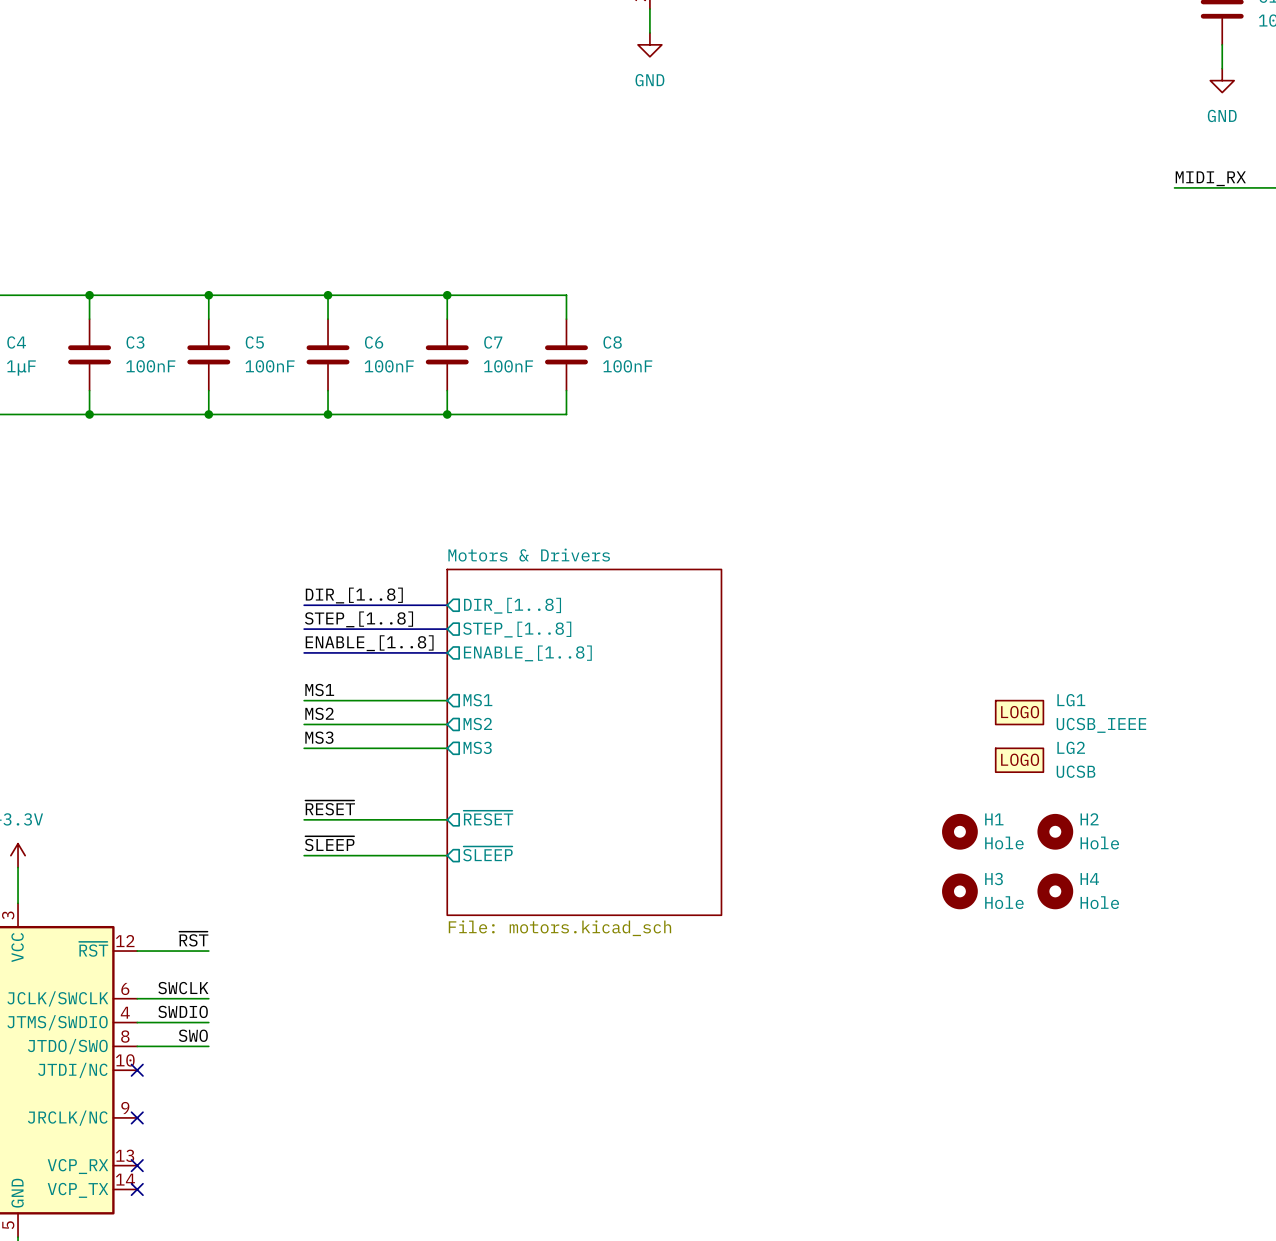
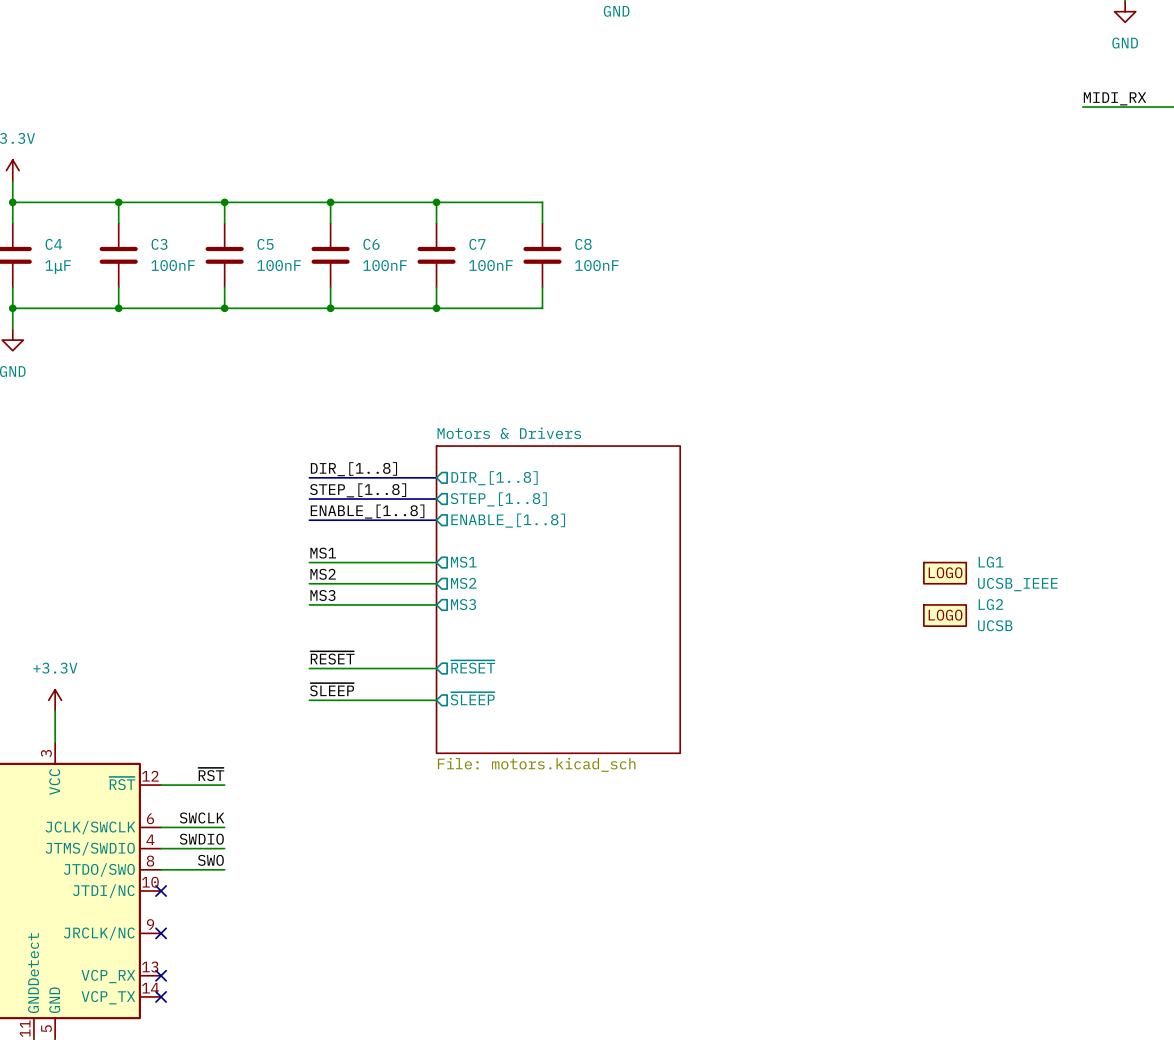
H1: Hole (959, 831) -> none
H2: Hole (1055, 831) -> none
H3: Hole (959, 891) -> none
H4: Hole (1055, 891) -> none

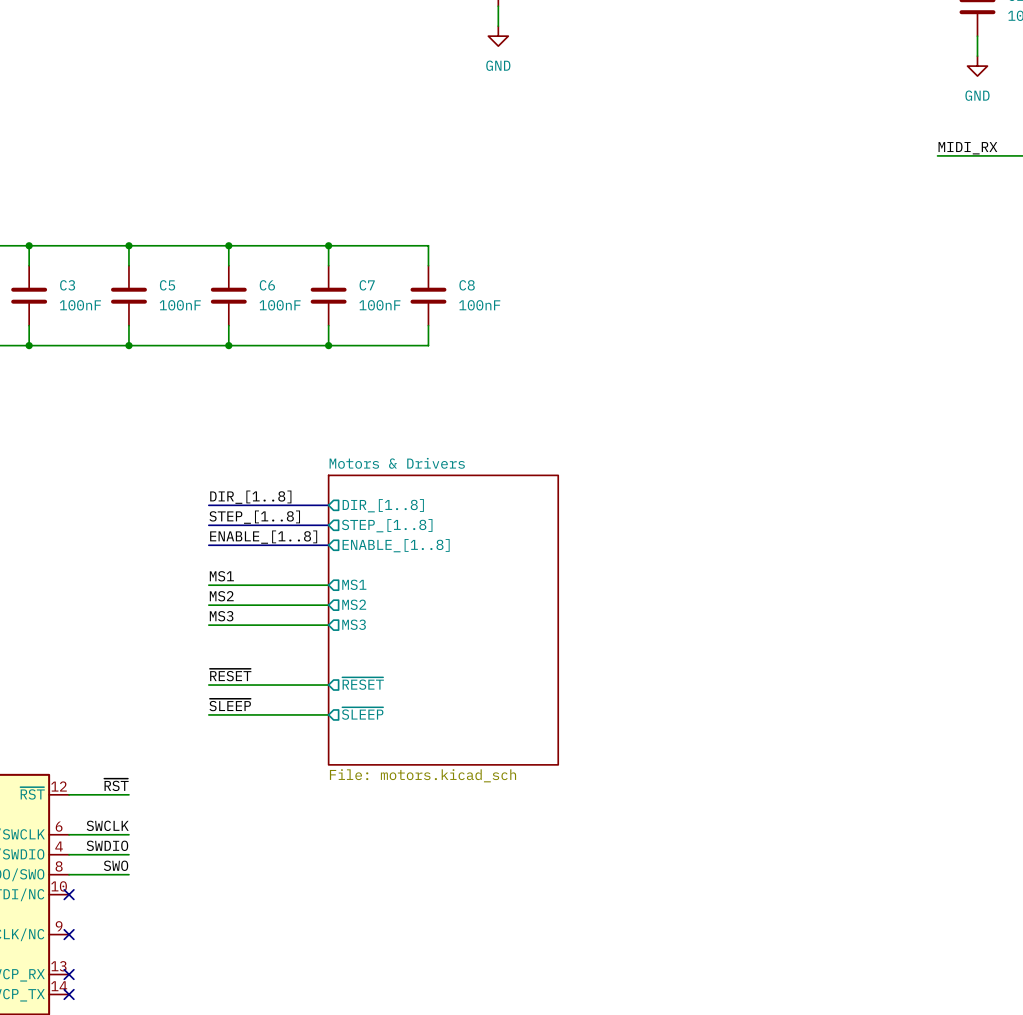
LG1: UCSB_IEEE (945, 573) -> none
LG2: UCSB (945, 615) -> none

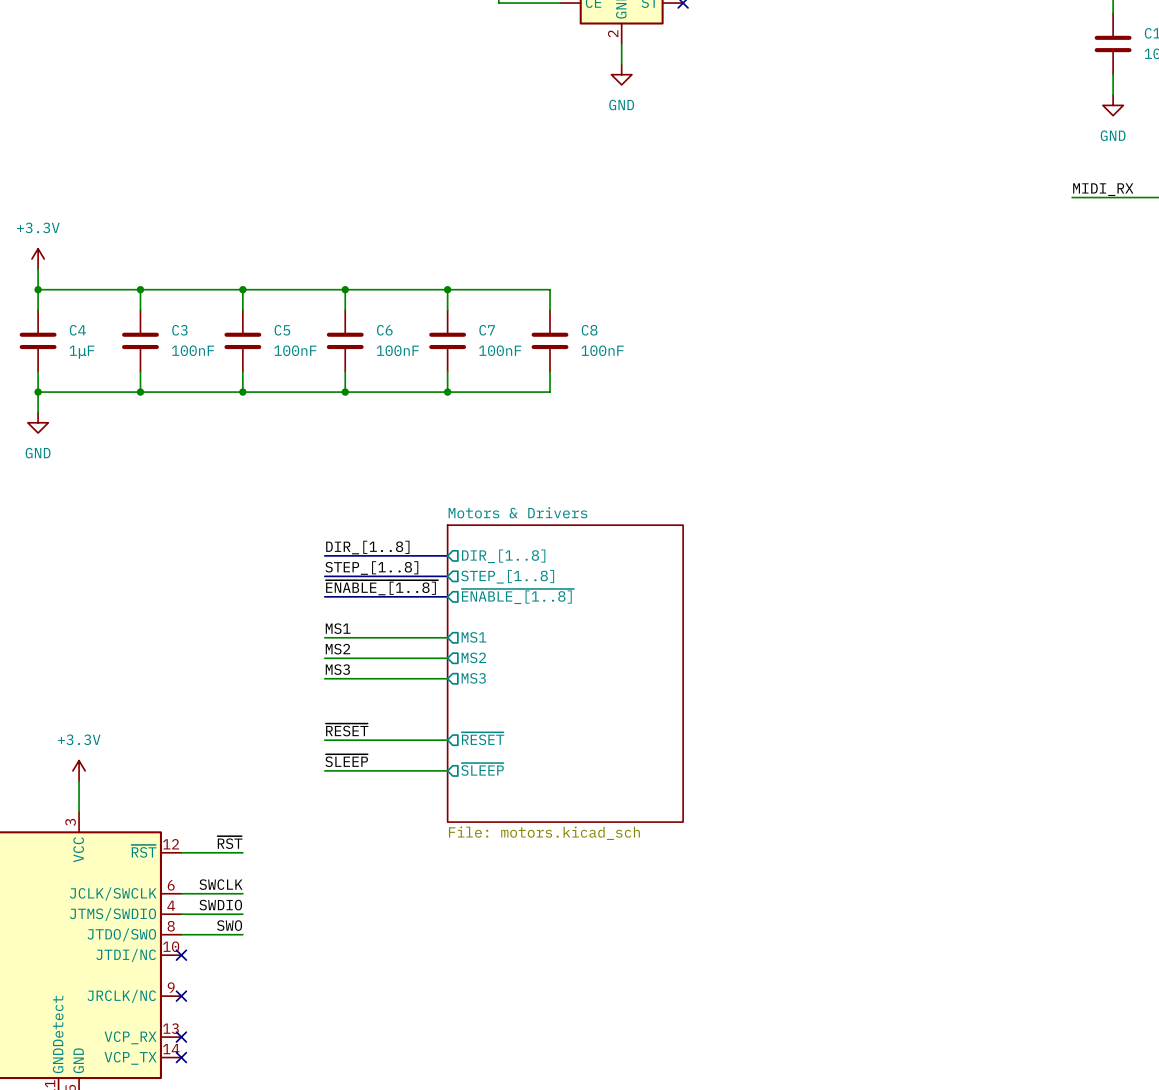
label: ENABLE_[1..8] (263, 537) -> ~{ENABLE_[1..8]} (381, 587)
sheet pin: ENABLE_[1..8] (396, 545) -> ~{ENABLE_[1..8]} (517, 596)

